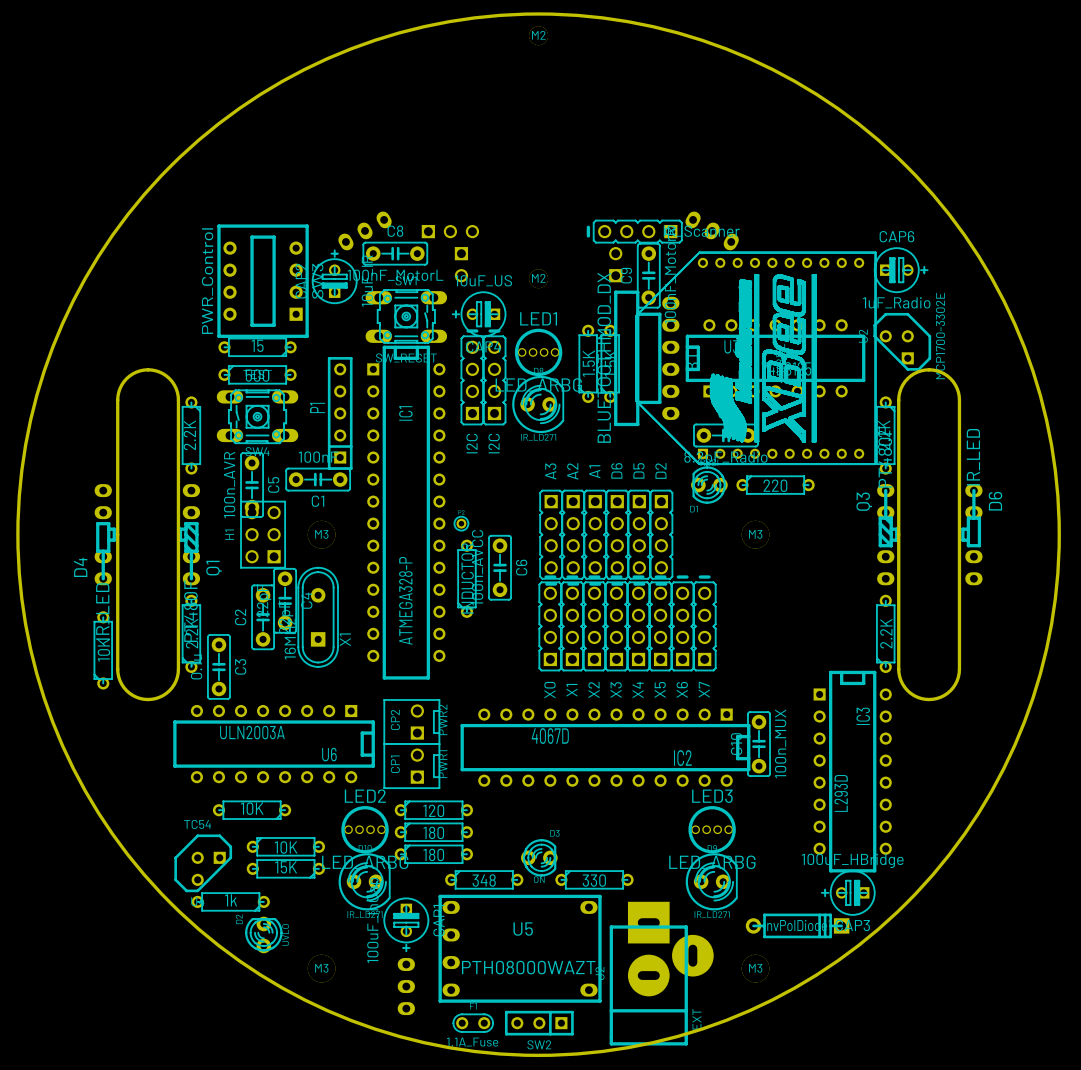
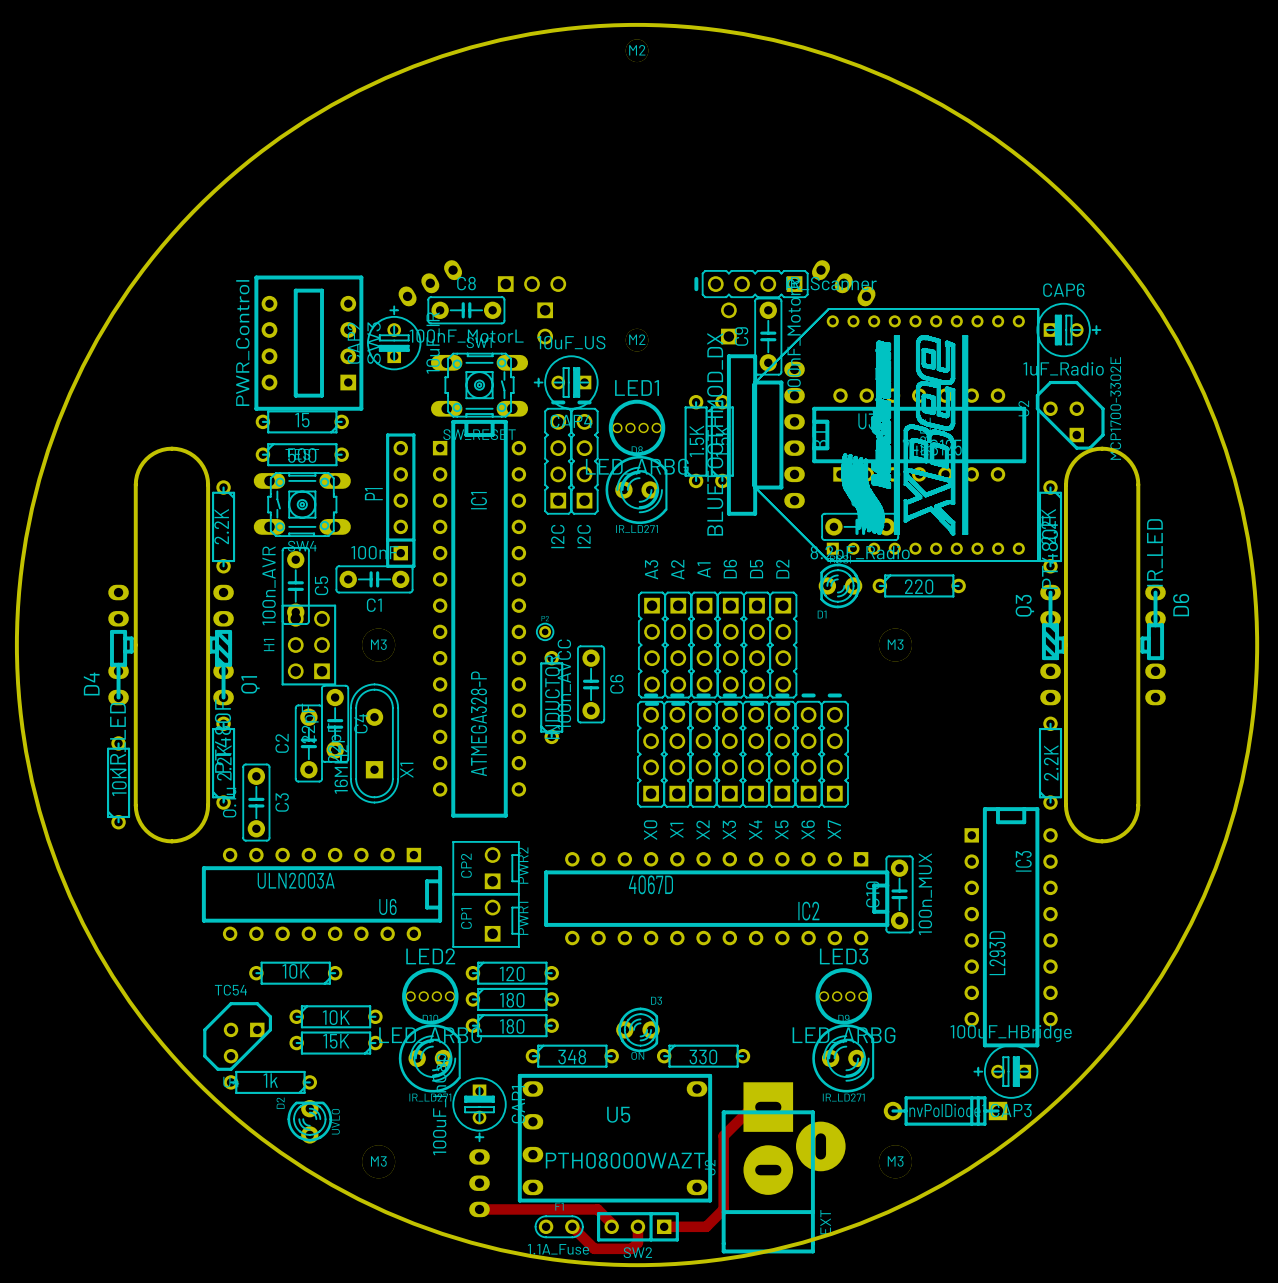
track: none -> (768, 1107) (752, 1107) (723, 1135) (723, 1209) (706, 1226) (664, 1226)
track: none -> (479, 1209) (597, 1209) (611, 1223) (611, 1226)
track: none -> (572, 1226) (594, 1248) (631, 1248) (637, 1242) (637, 1226)

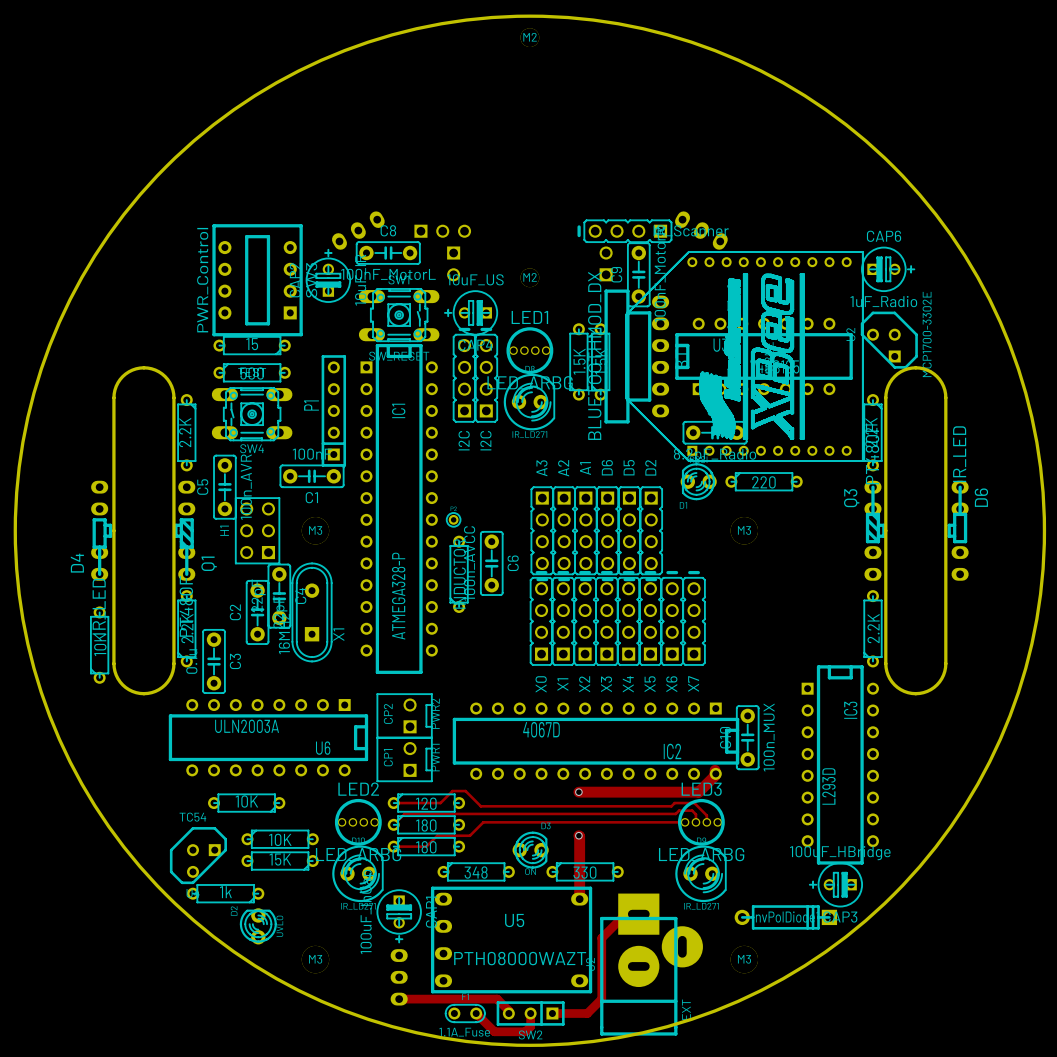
C5 rotation: 0° (295, 585) -> 180° (224, 487)
track: none -> (715, 770) (715, 775) (698, 792) (578, 792)
via: none -> (578, 792)
track: none -> (393, 803) (440, 803) (452, 791) (465, 791) (480, 806) (671, 806) (674, 803) (694, 803) (706, 815) (706, 822)
track: none -> (685, 822) (483, 822) (469, 835) (437, 835) (426, 846) (393, 846)
track: none -> (695, 822) (695, 814) (692, 810) (679, 810) (675, 813) (404, 813) (393, 824)
track: none -> (578, 835) (579, 899)
via: none -> (578, 835)

